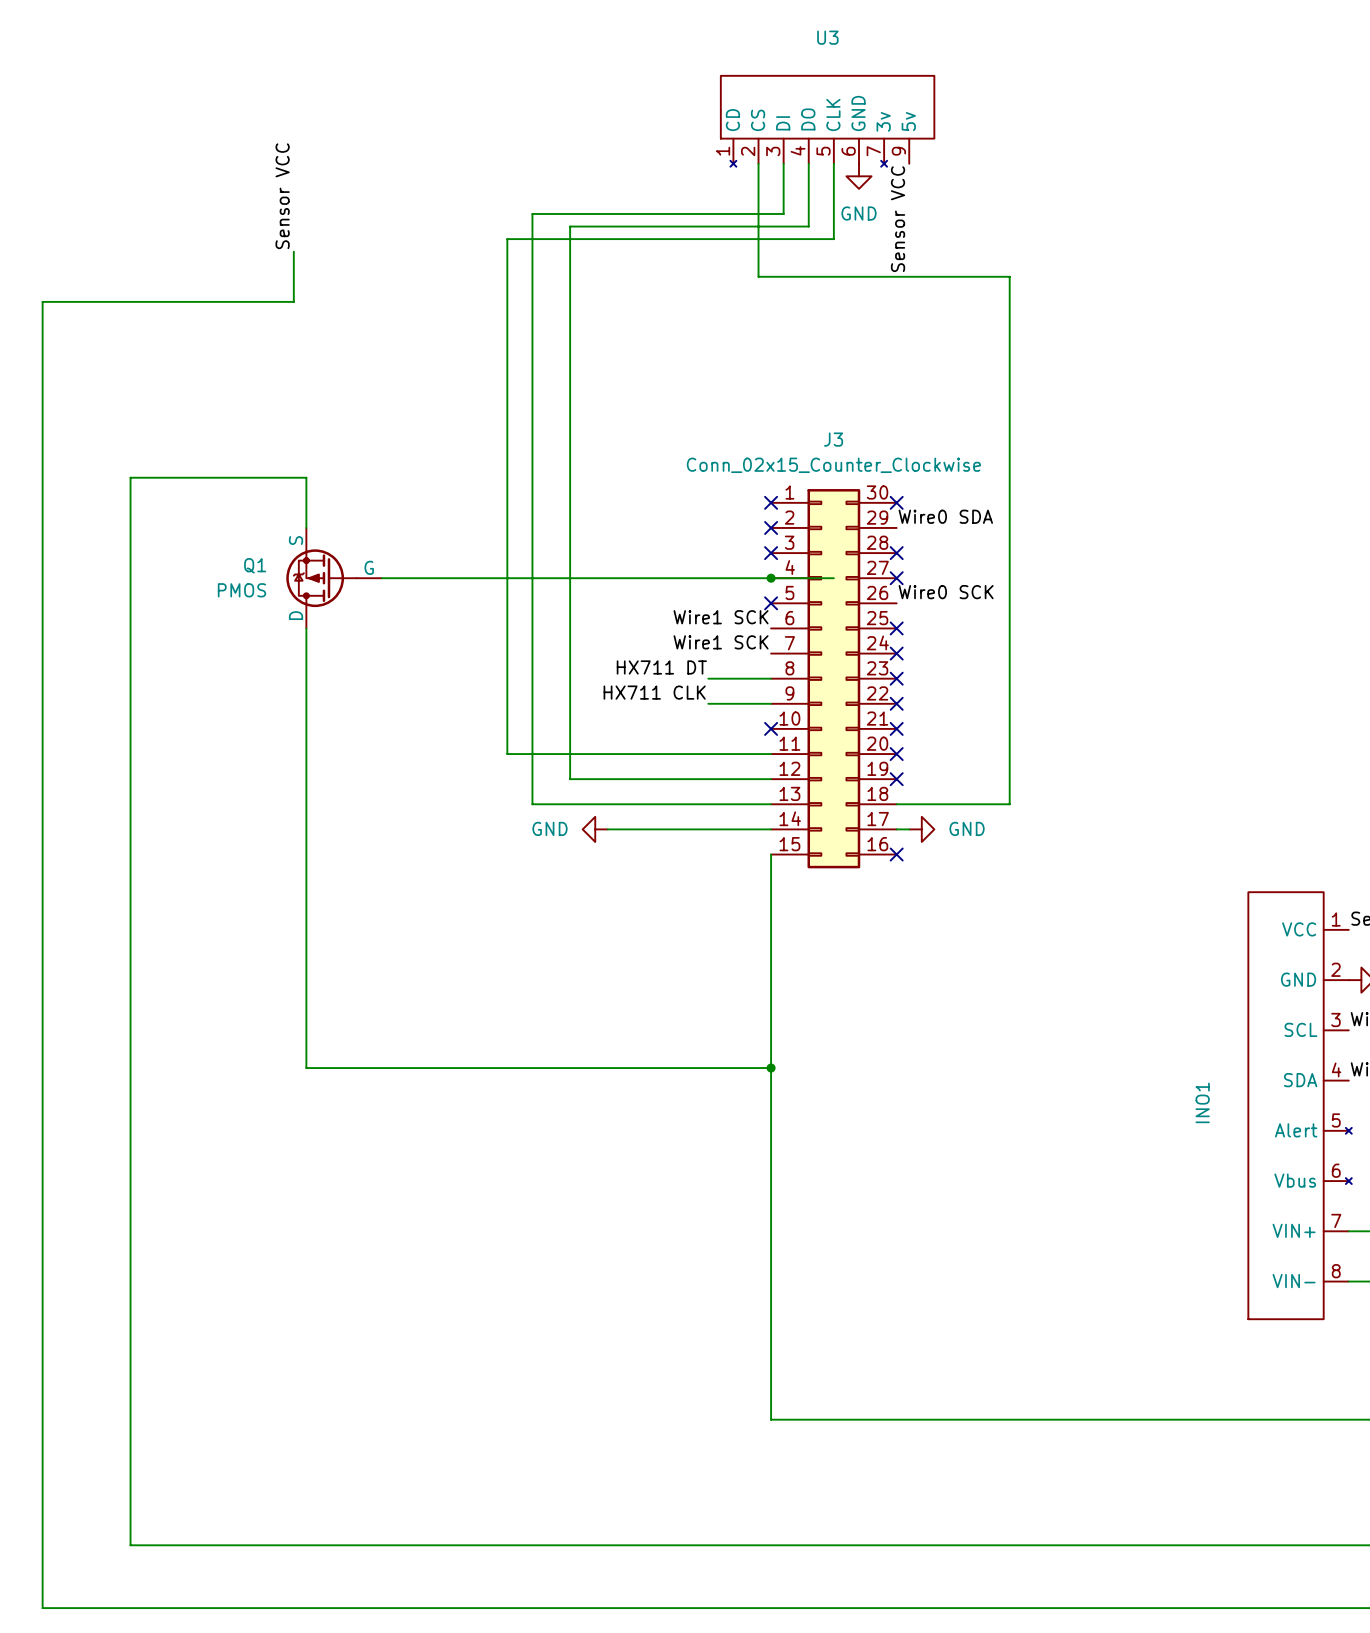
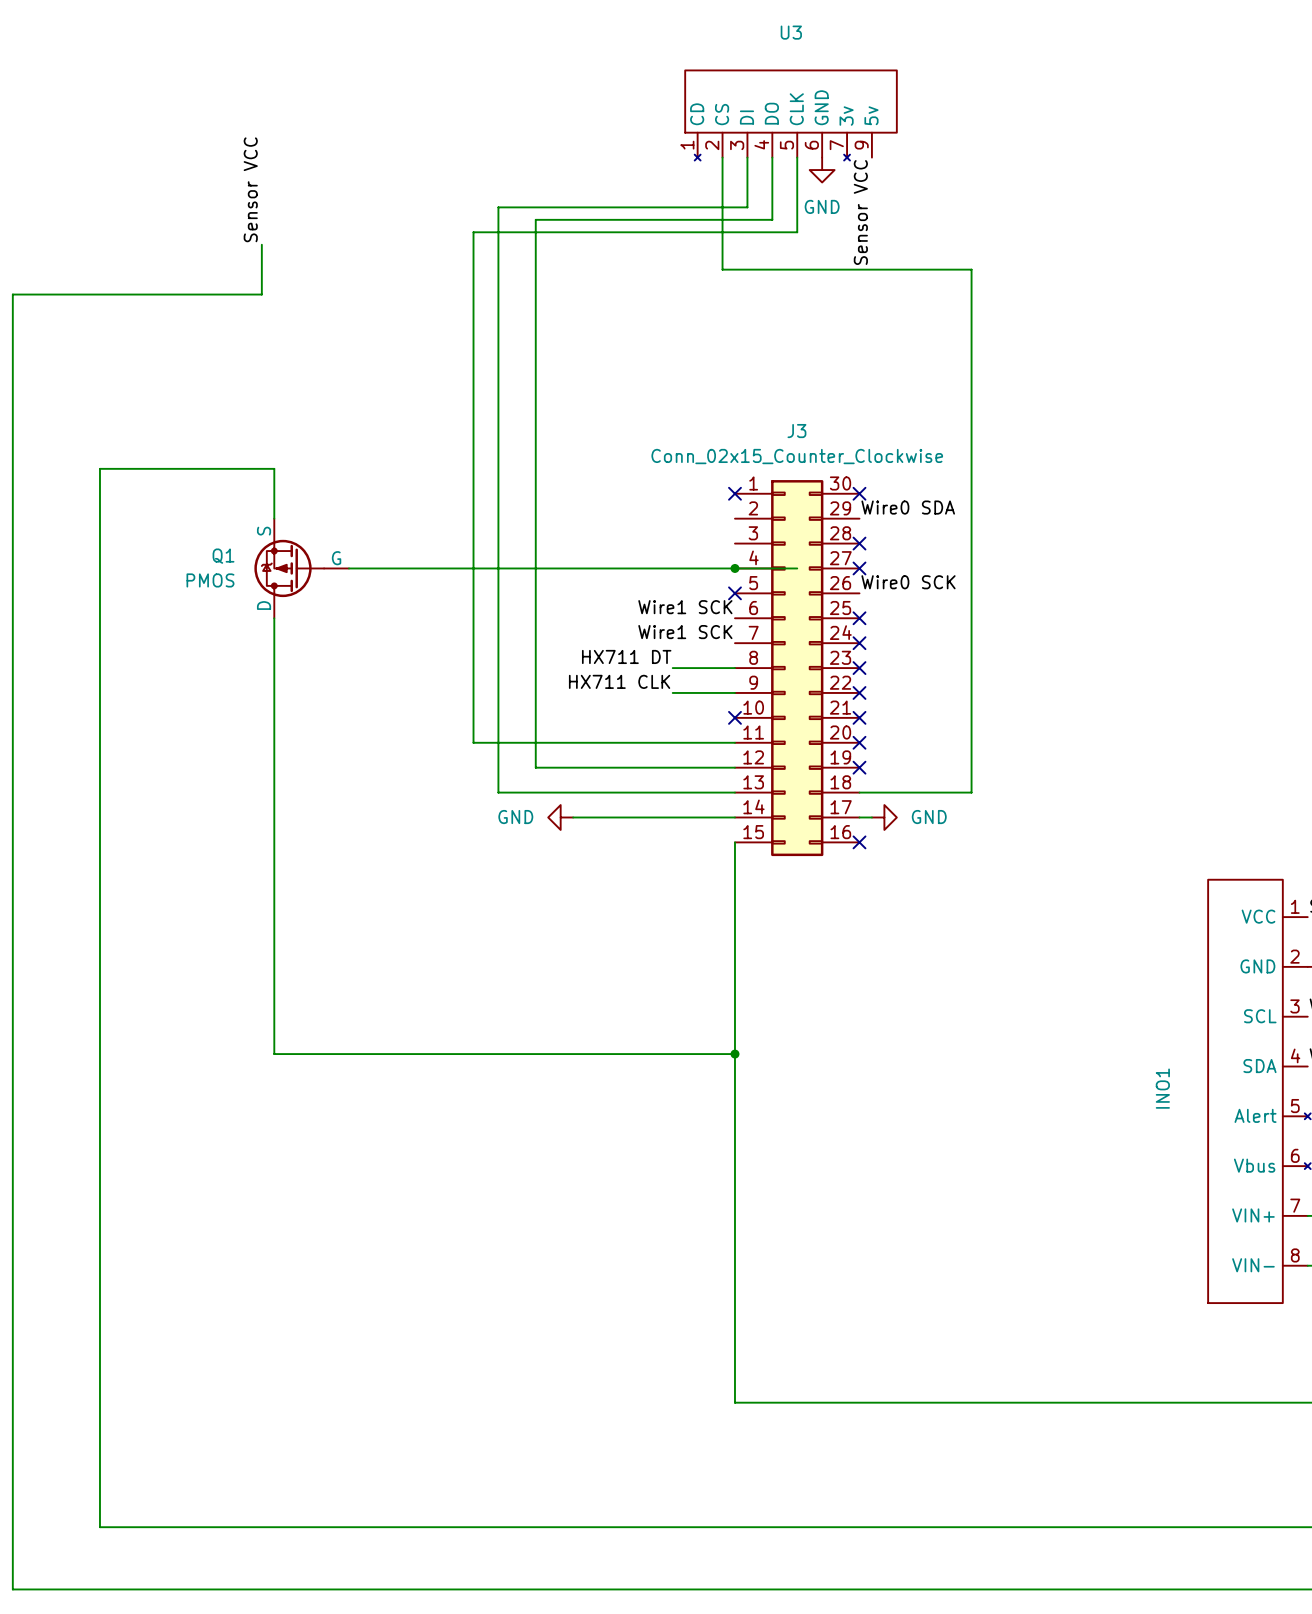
no-connect mark: (771, 527) -> none
no-connect mark: (771, 553) -> none

